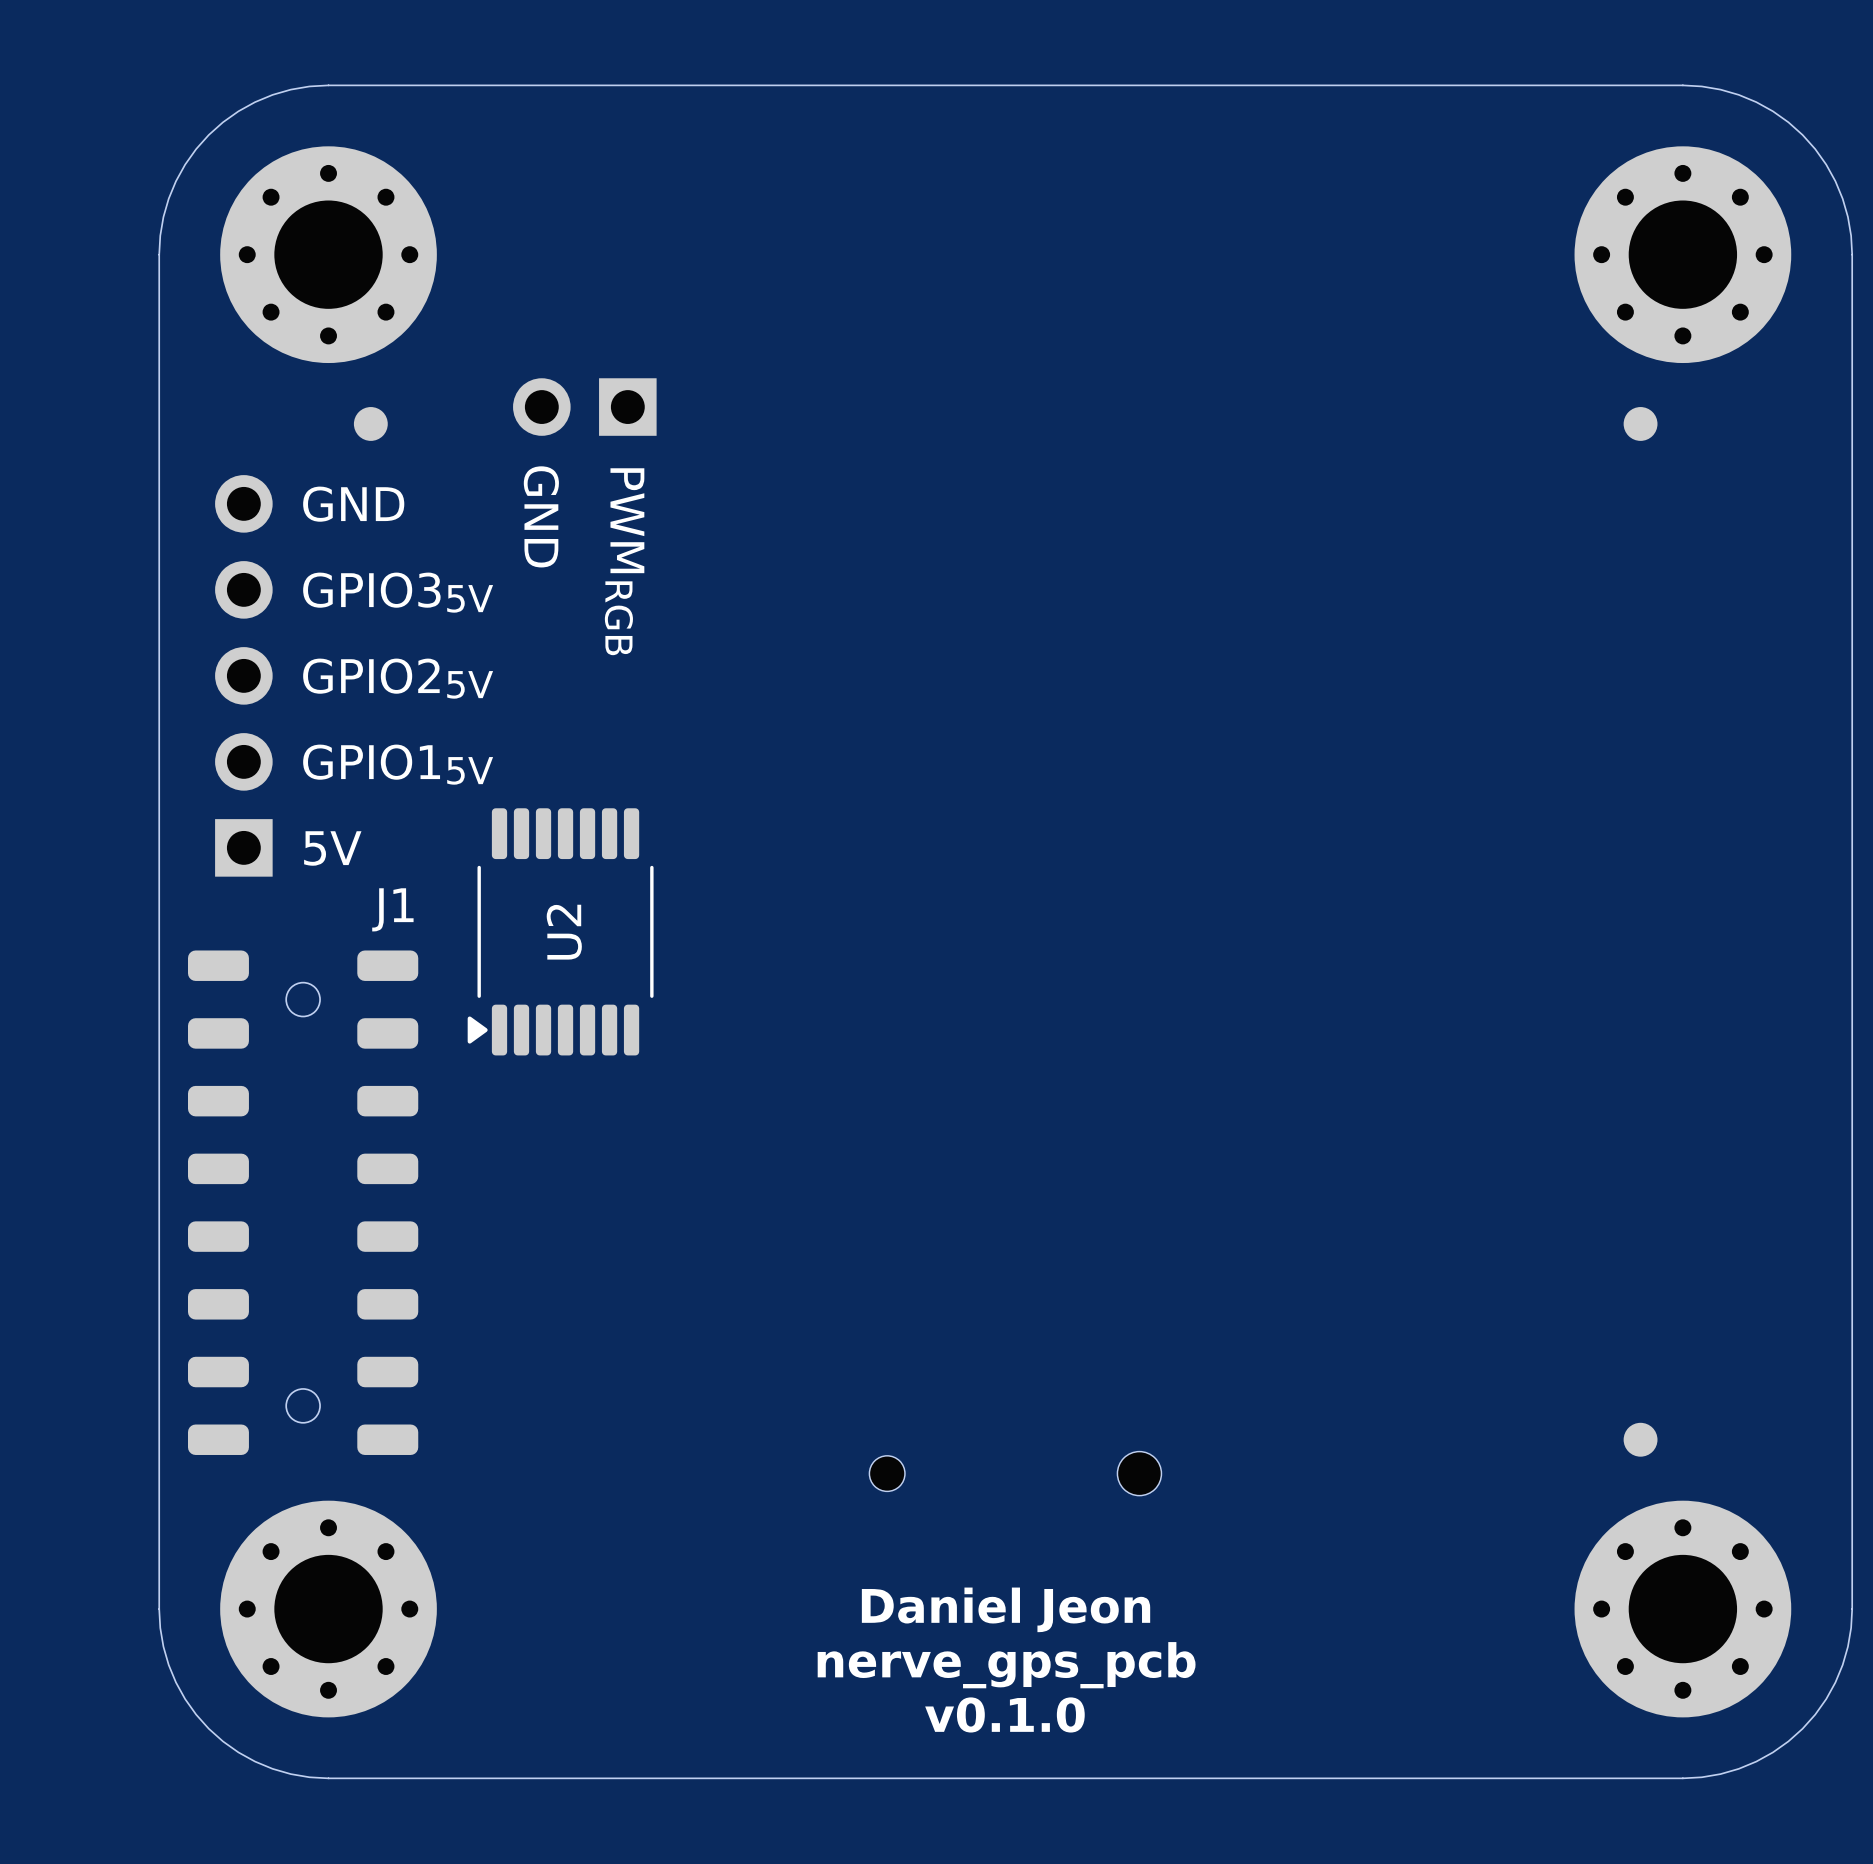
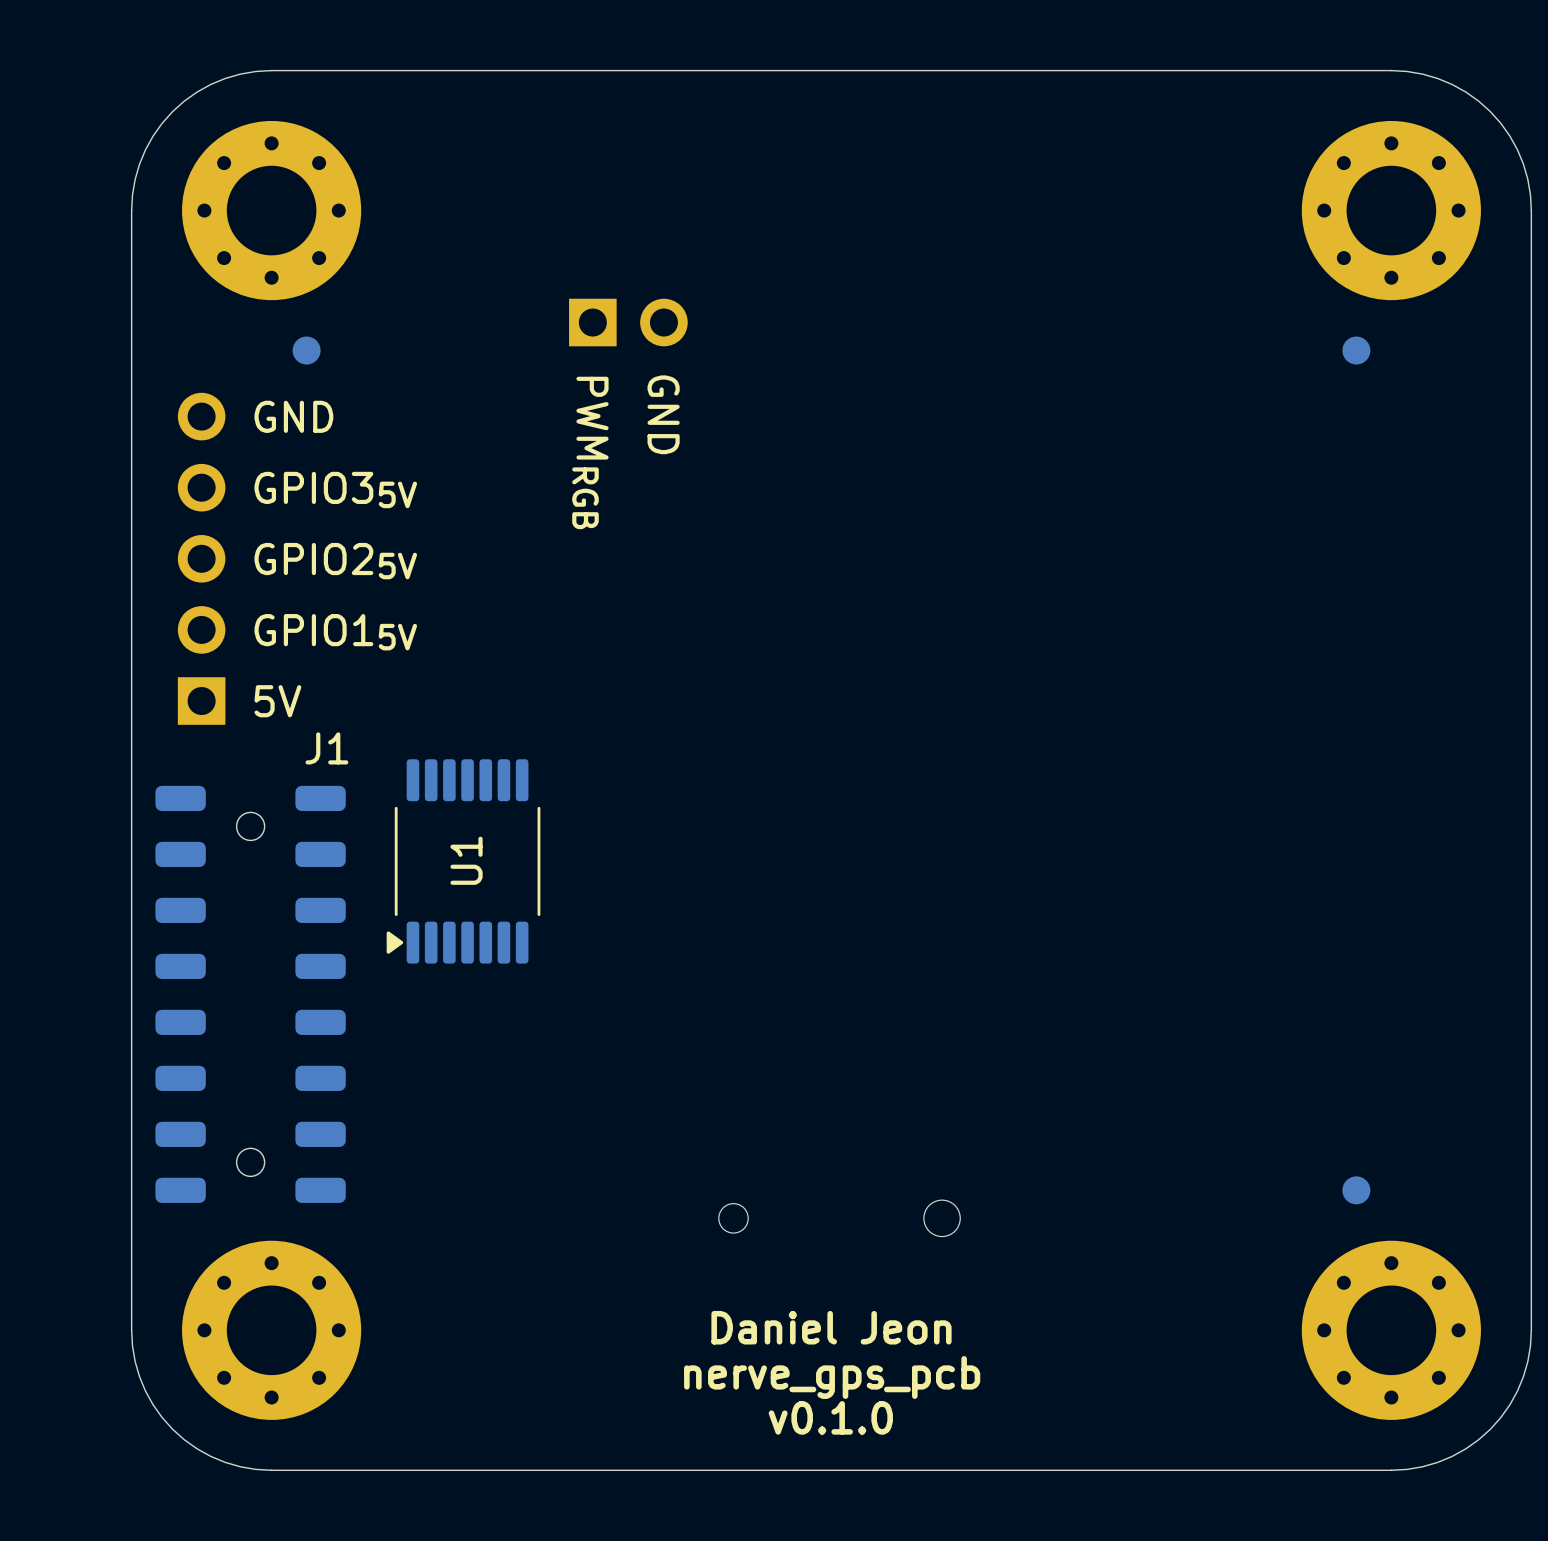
part rotation: 0° (584, 407) -> 180° (628, 322)
part position: (584, 407) -> (628, 322)
text position: GND (541, 516) -> GND (663, 414)
text position: PWMRGB (624, 561) -> PWMRGB (590, 452)
U2: (560, 931) -> none
U1: none -> (463, 861)

